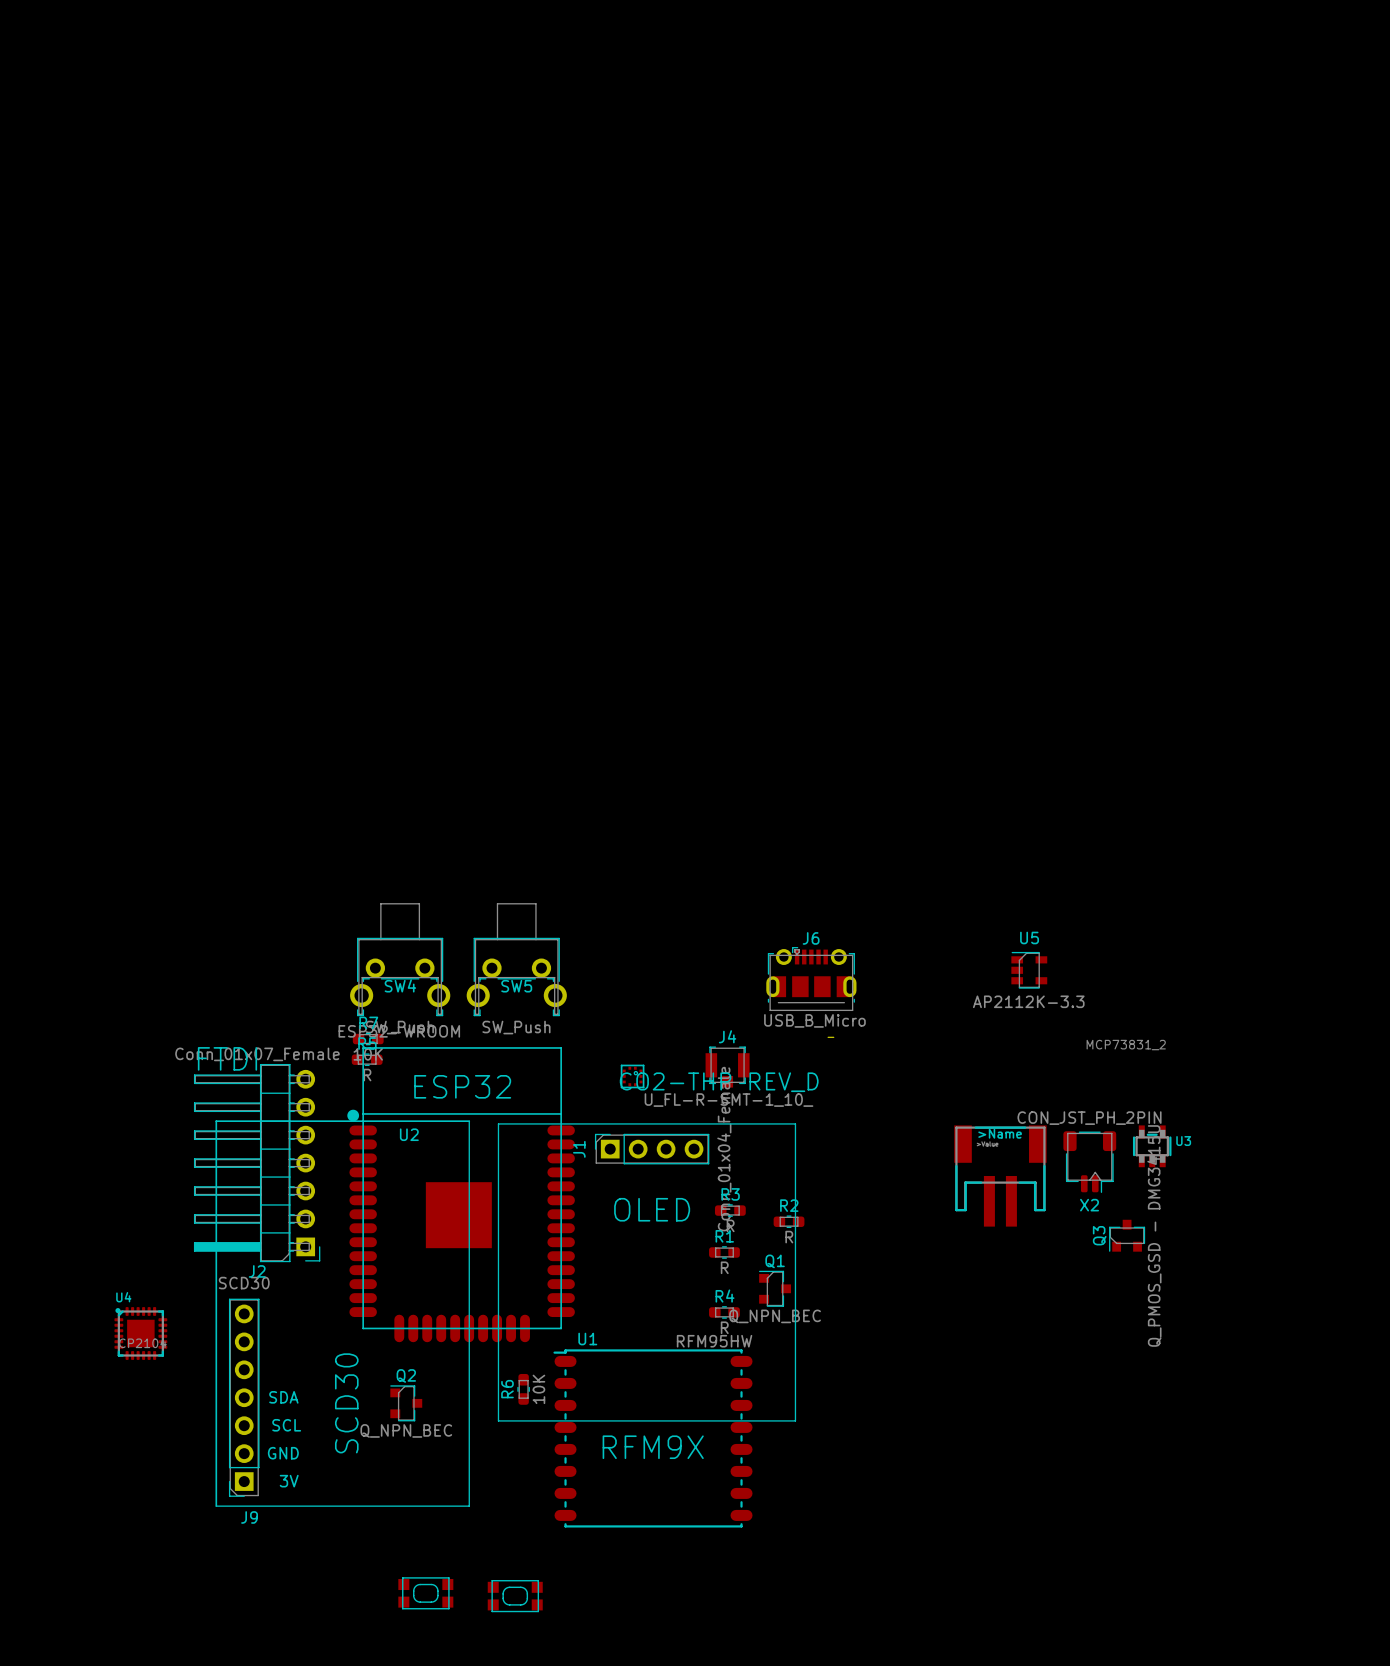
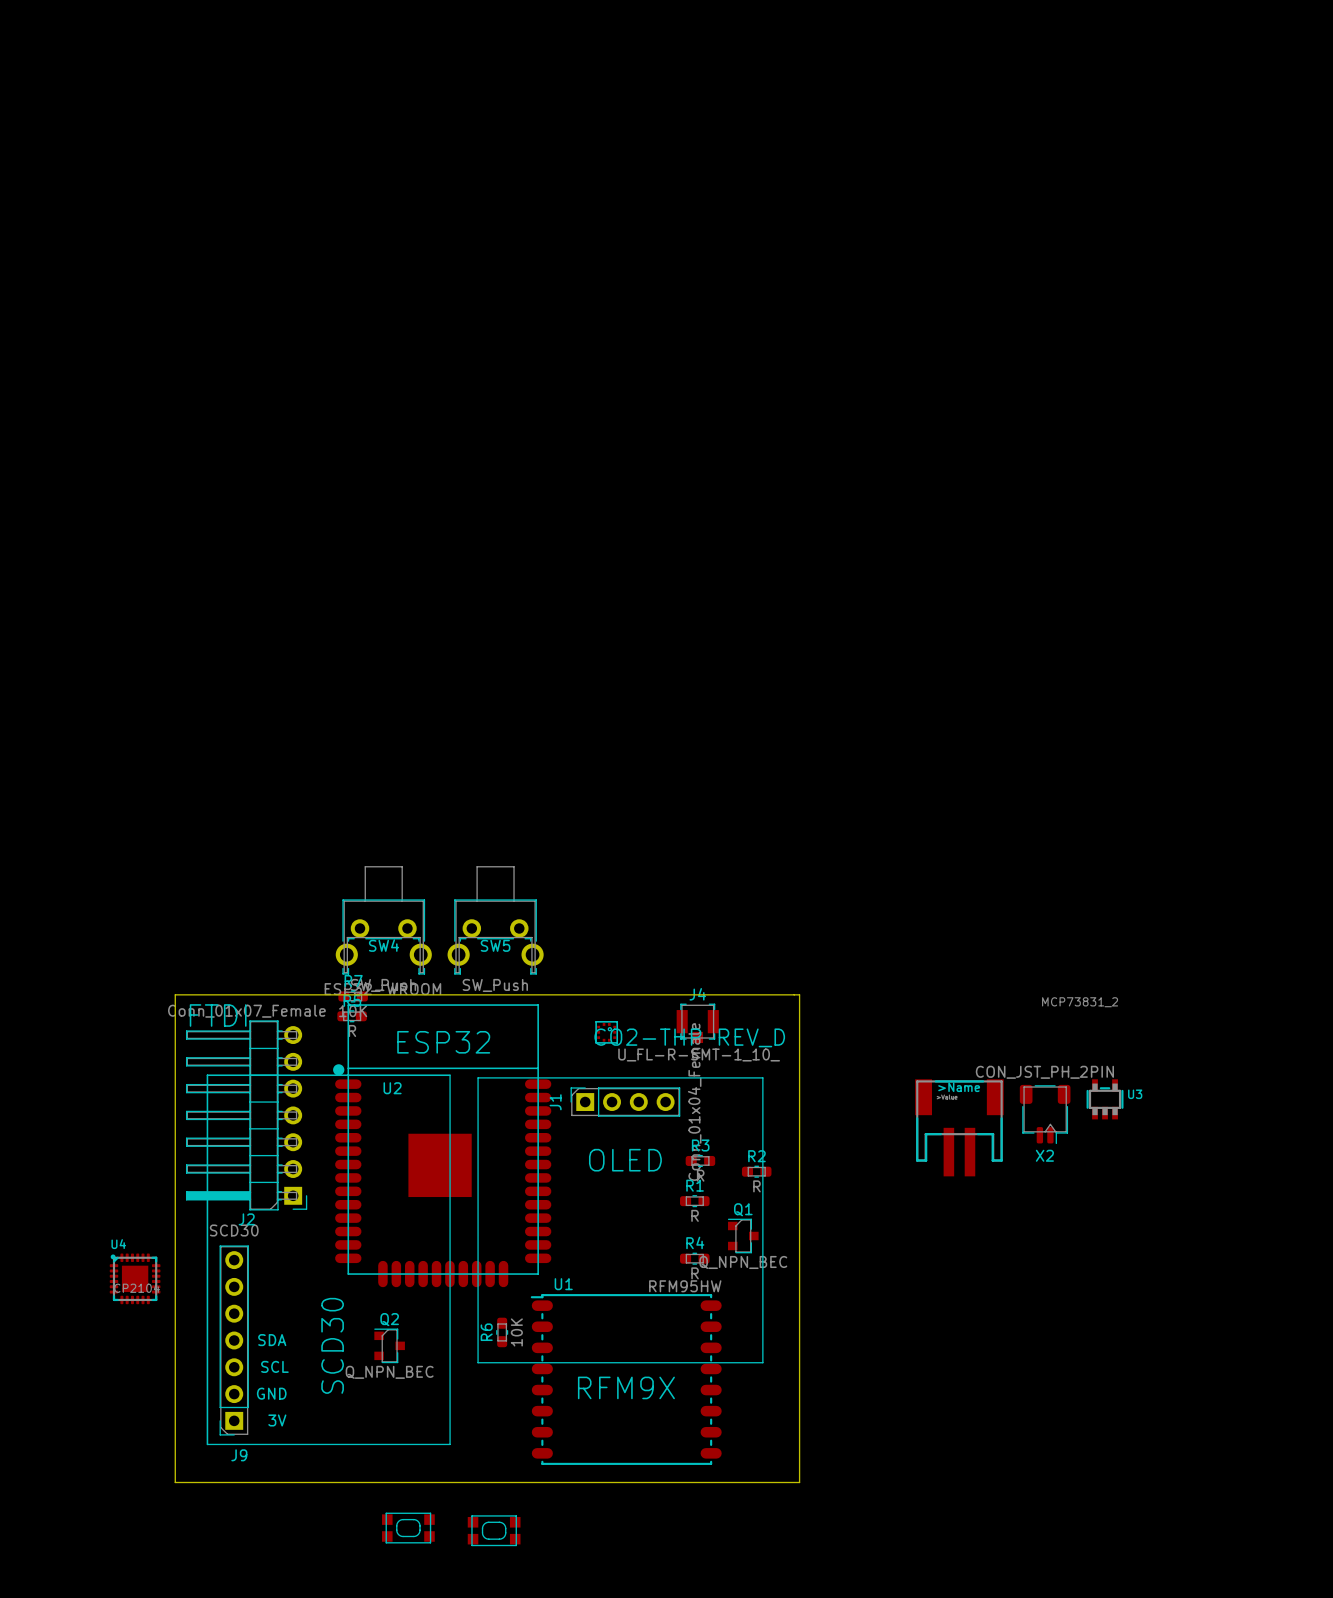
U5: AP2112K-3.3 (1029, 970) -> none
J6: USB_B_Micro (811, 978) -> none
board edge: none -> (794, 994) (175, 994) (175, 1482) (799, 1482) (799, 994)
Q3: Q_PMOS_GSD - DMG3415U (1127, 1235) -> none

